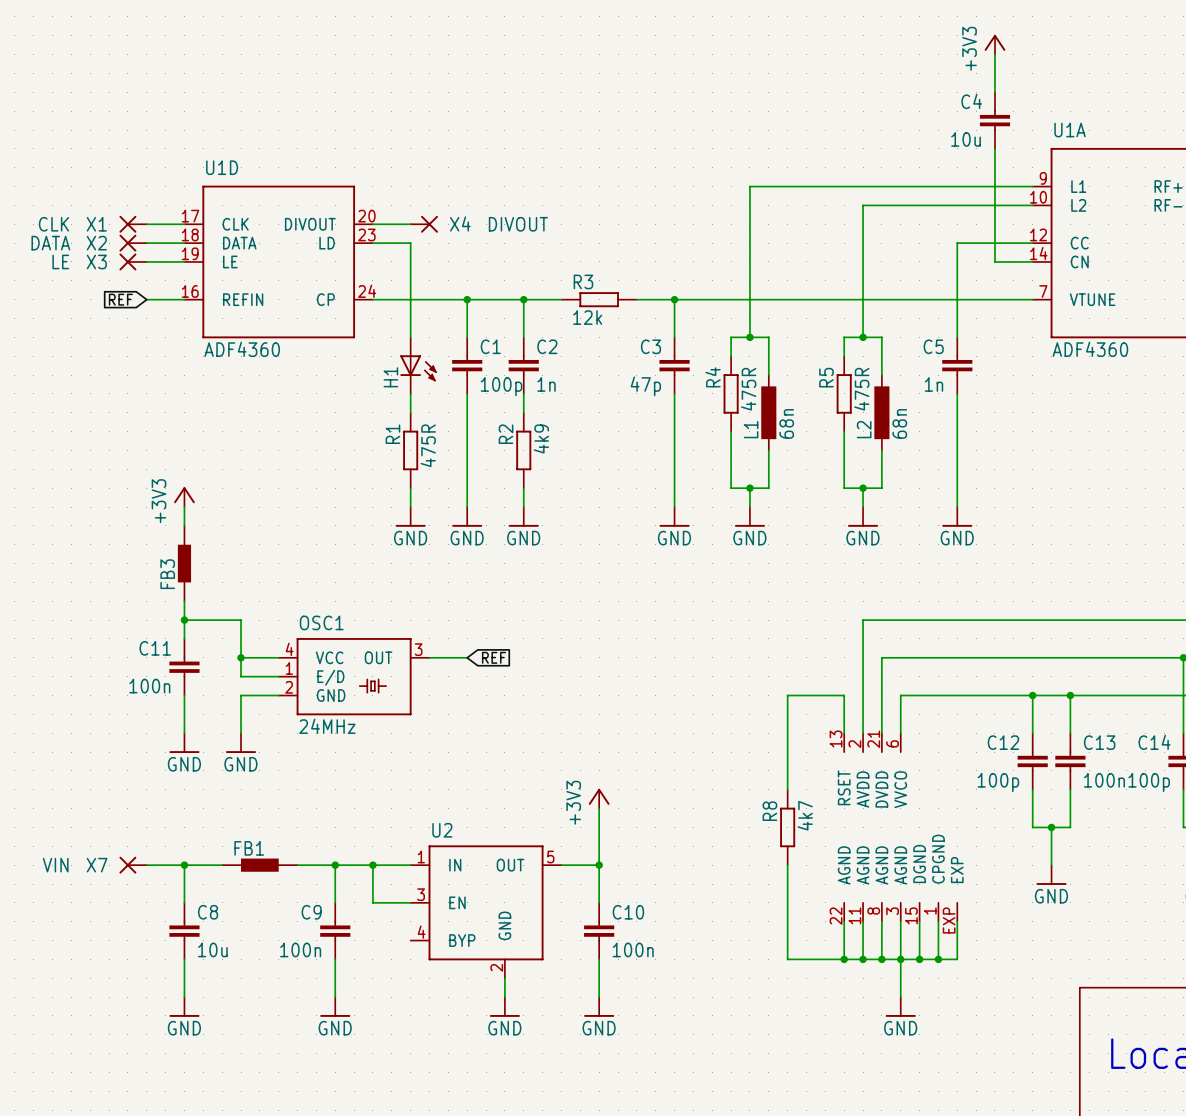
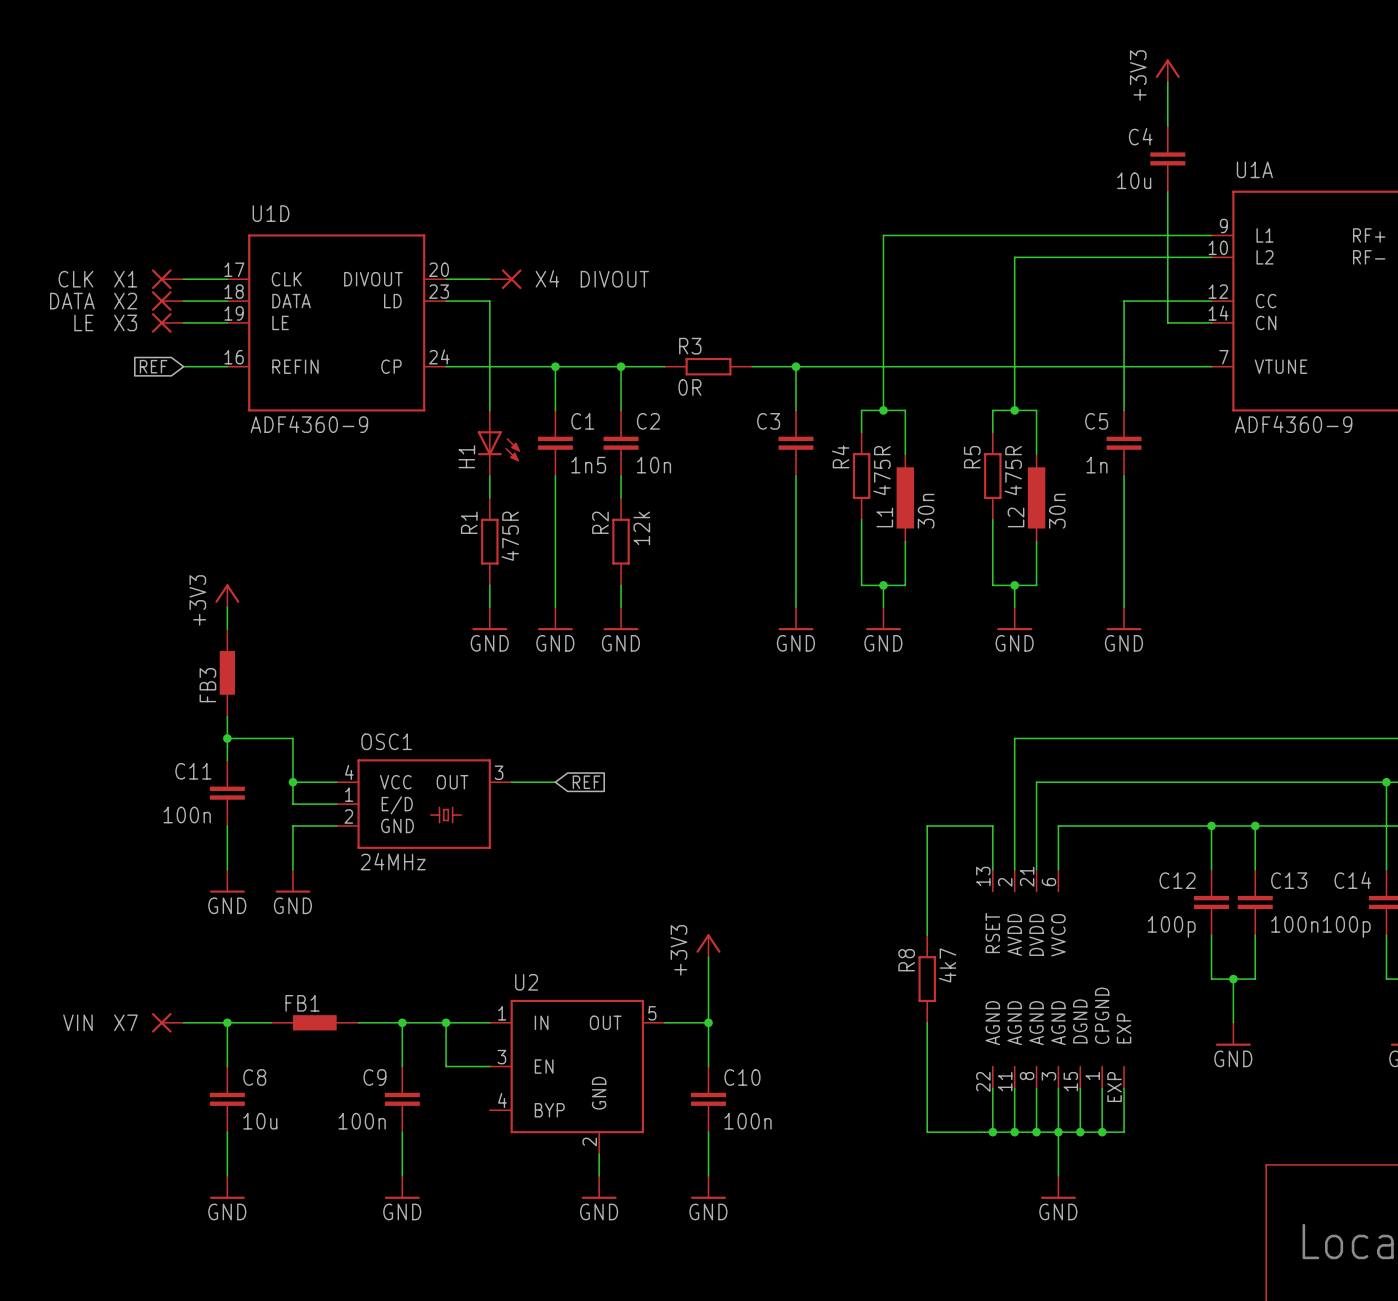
R3 value: 12k (587, 317) -> 0R (689, 387)
U1D value: ADF4360 (242, 349) -> ADF4360-9 (309, 424)
U1A value: ADF4360 (1090, 349) -> ADF4360-9 (1293, 424)
C2 value: 1n (546, 384) -> 10n (653, 465)
C1 value: 100p (501, 386) -> 1n5 (588, 465)
C3 value: 47p (645, 386) -> none
L1 value: 68n (786, 423) -> 30n (926, 511)
L2 value: 68n (899, 423) -> 30n (1057, 511)
R2 value: 4k9 (541, 439) -> 12k (641, 528)

